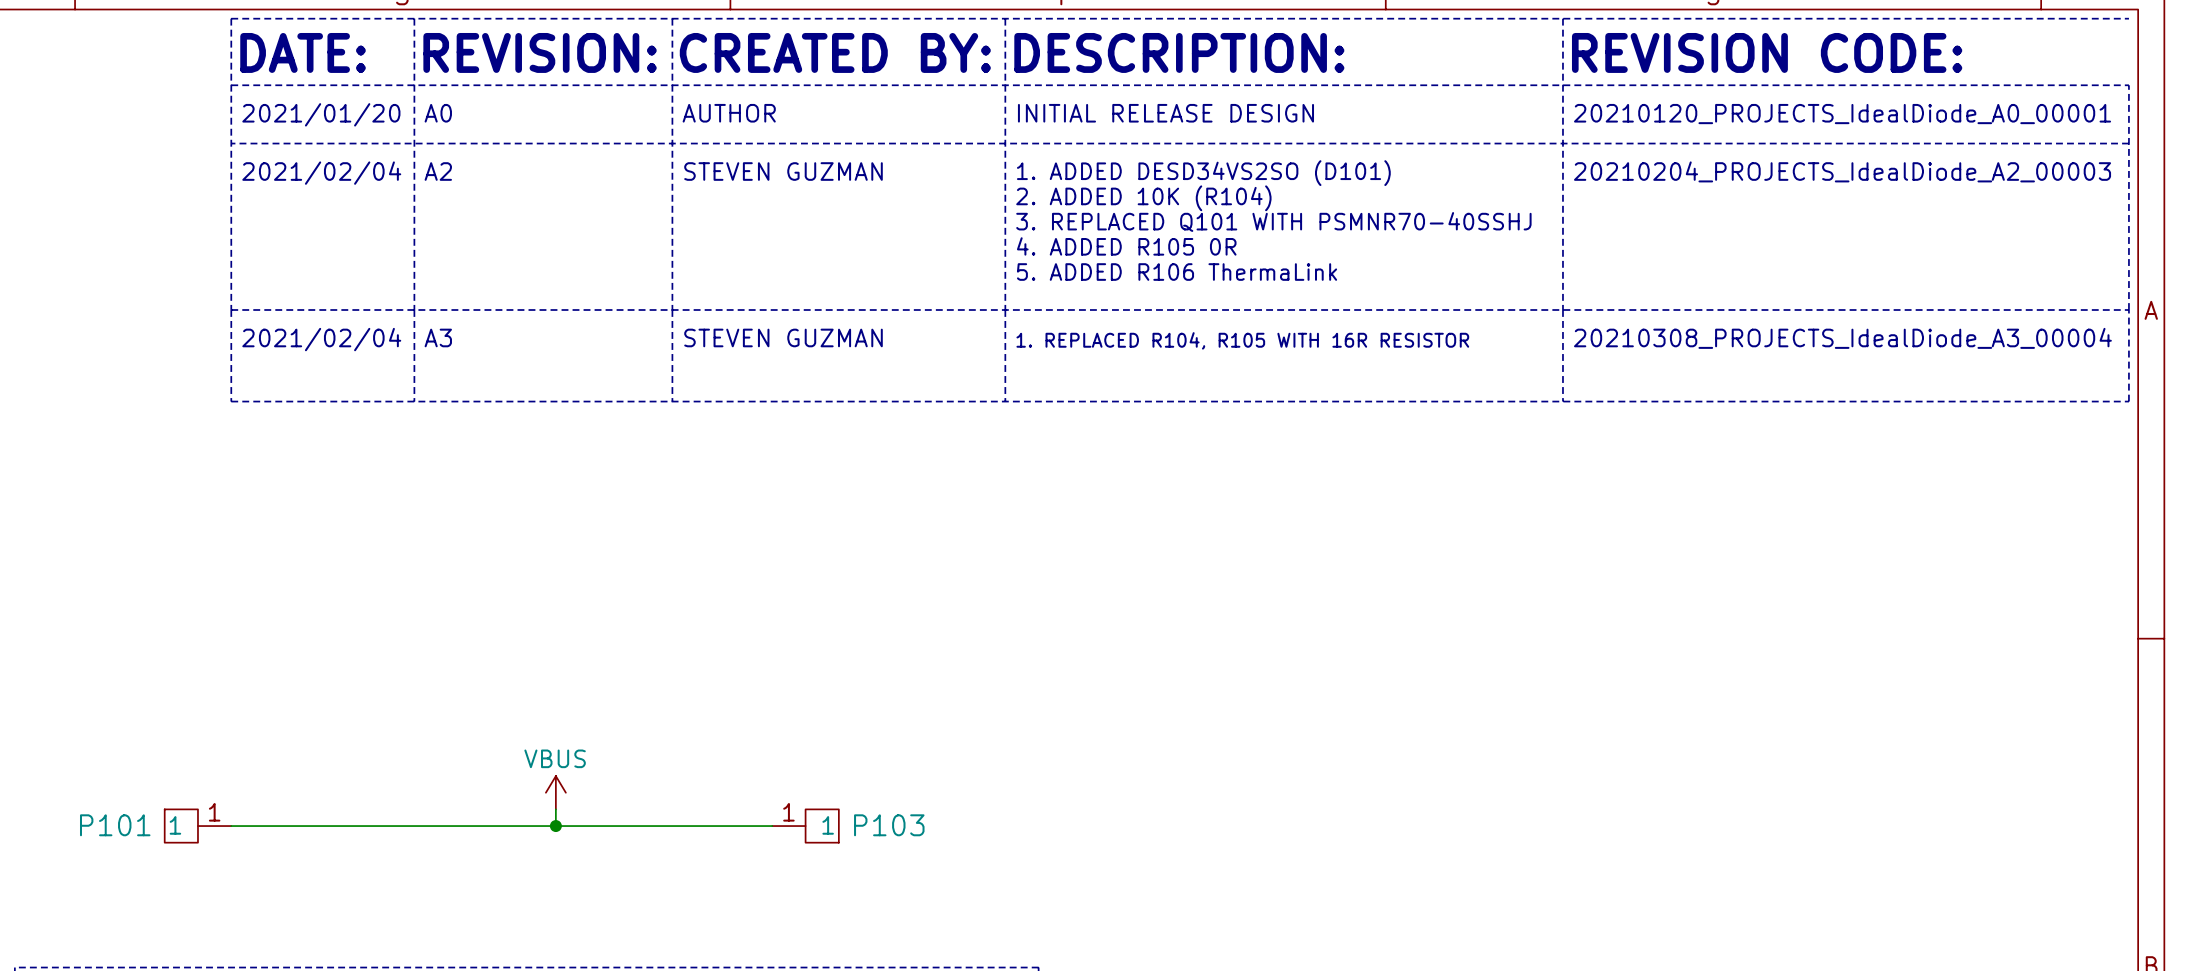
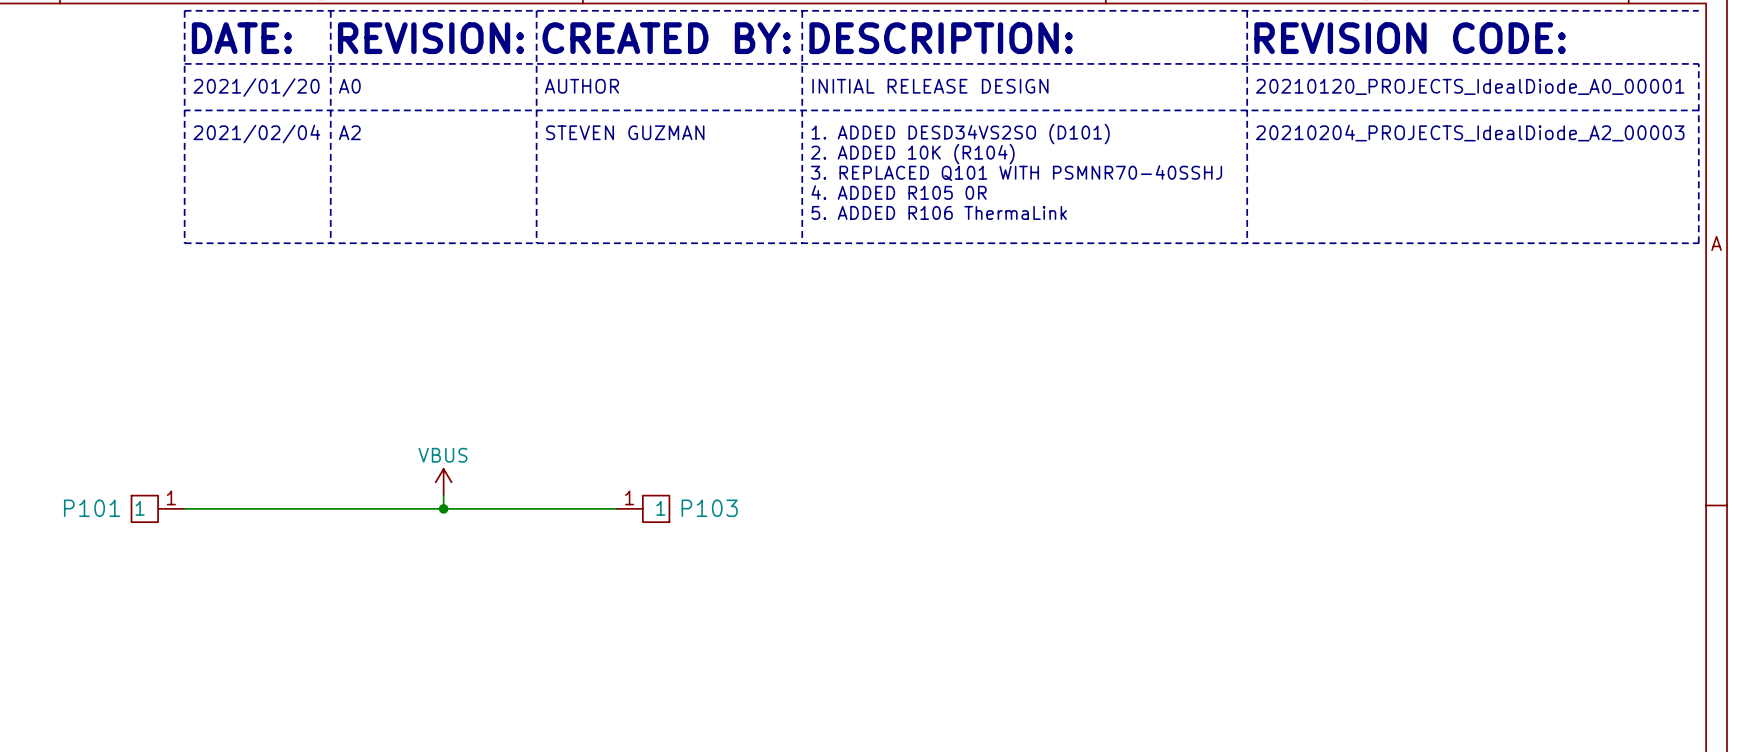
line: (231, 310) (231, 401) (2128, 401) (2128, 310) -> none
line: (414, 310) (414, 401) -> none
line: (672, 310) (672, 401) -> none
line: (1005, 310) (1005, 401) -> none
line: (1562, 310) (1562, 401) -> none
text: A3 (438, 337) -> none
text: STEVEN GUZMAN (783, 337) -> none
text: 20210308_PROJECTS_IdealDiode_A3_00004 (1842, 338) -> none
text: 2021/02/04 (321, 339) -> none
text: 1. REPLACED R104, R105 WITH 16R RESISTOR (1242, 340) -> none
junction: none -> (443, 508)
power symbol position: VBUS (555, 792) -> VBUS (443, 482)
wire: (555, 809) (555, 826) -> (443, 495) (443, 508)
P101 position: (197, 826) -> (158, 508)
wire: (231, 826) (772, 826) -> (184, 508) (616, 508)
junction: (555, 826) -> none
P103 position: (805, 826) -> (642, 508)

